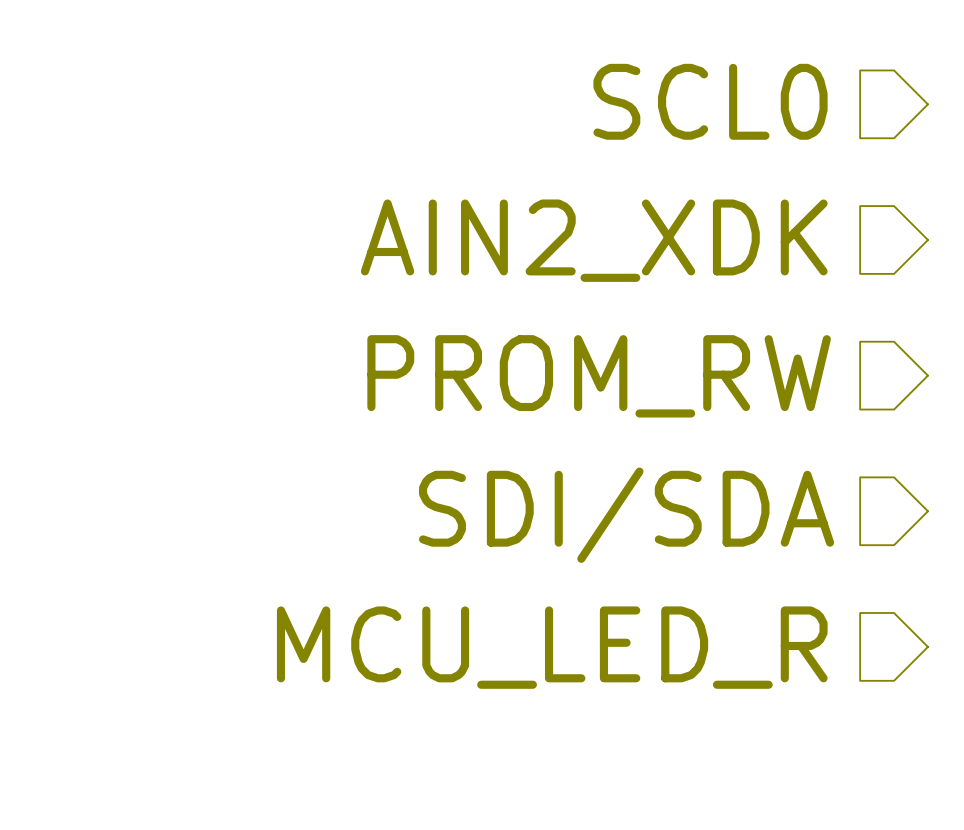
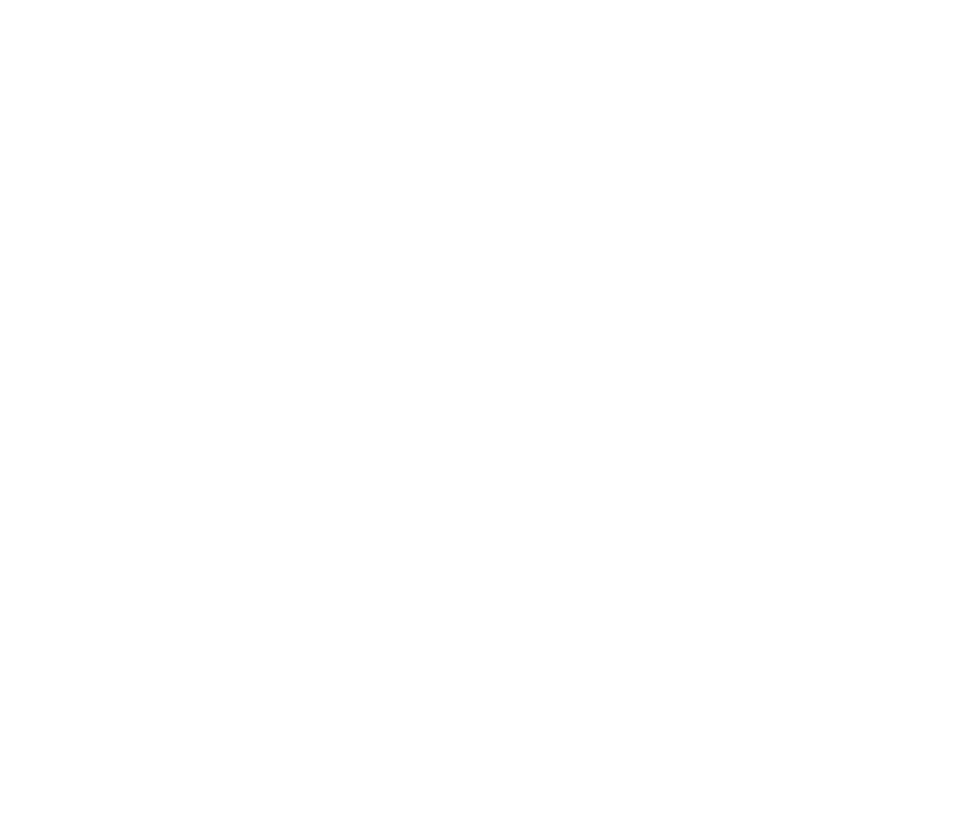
hierarchical label: SCL0 (710, 101) -> none
hierarchical label: AIN2_XDK (594, 240) -> none
hierarchical label: PROM_RW (599, 376) -> none
hierarchical label: SDI/SDA (626, 515) -> none
hierarchical label: MCU_LED_R (552, 647) -> none

